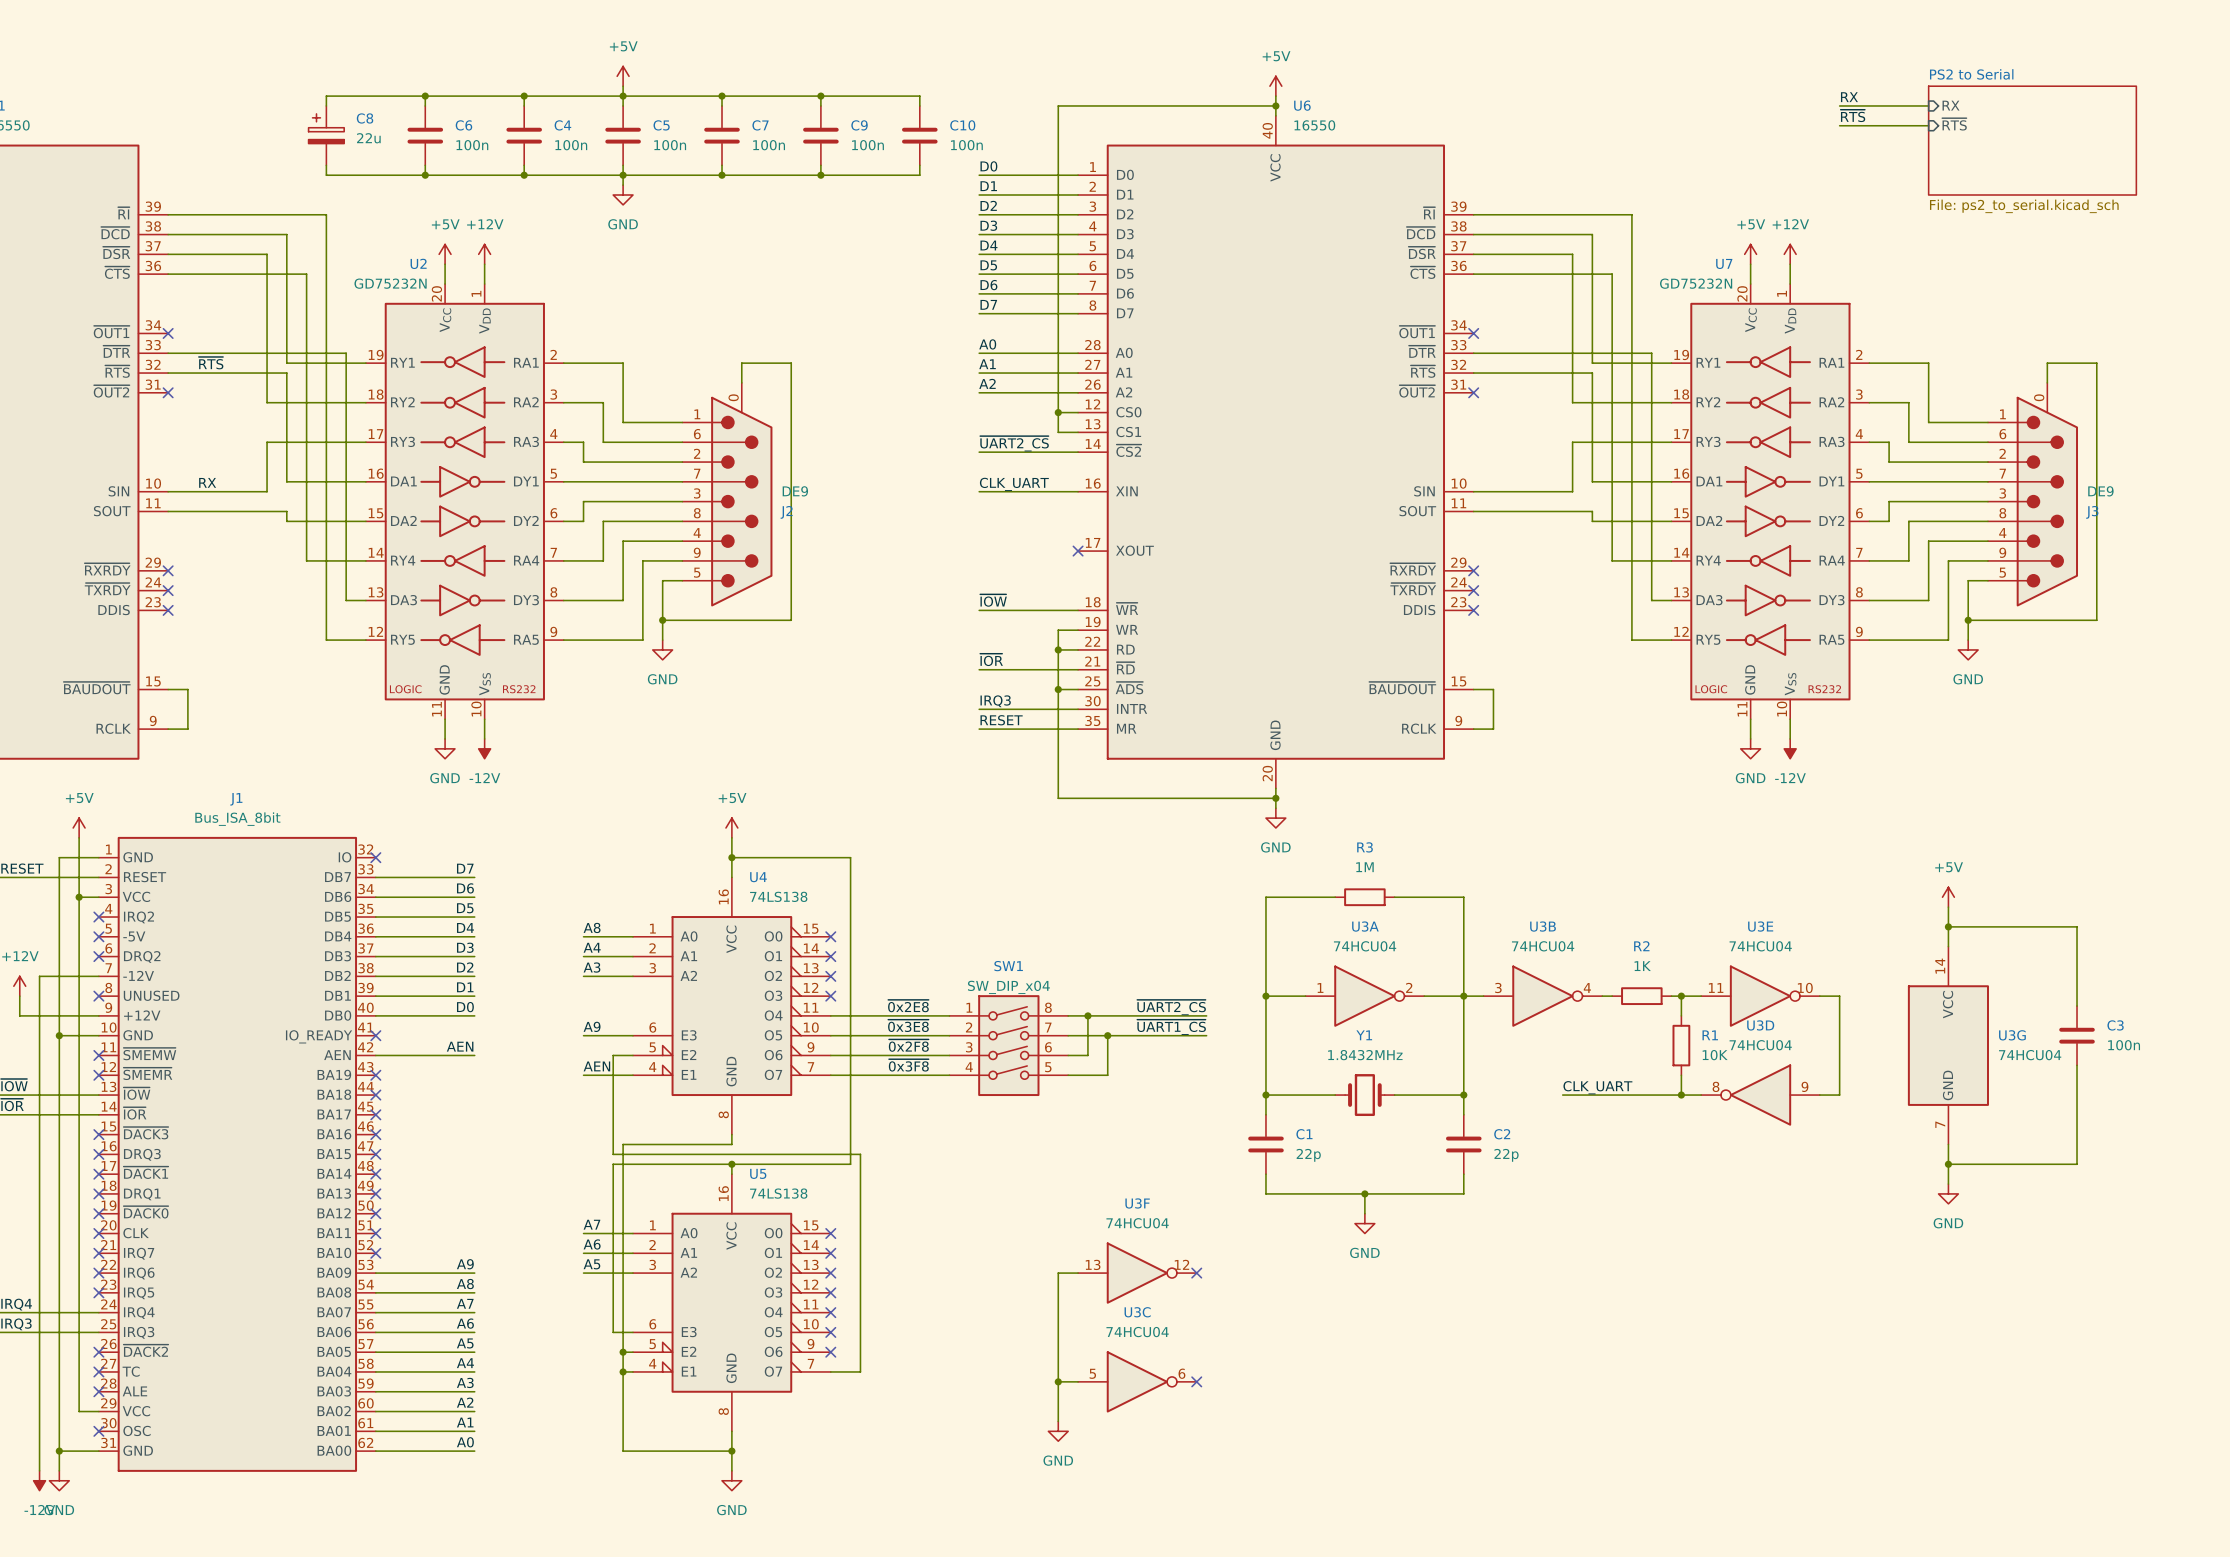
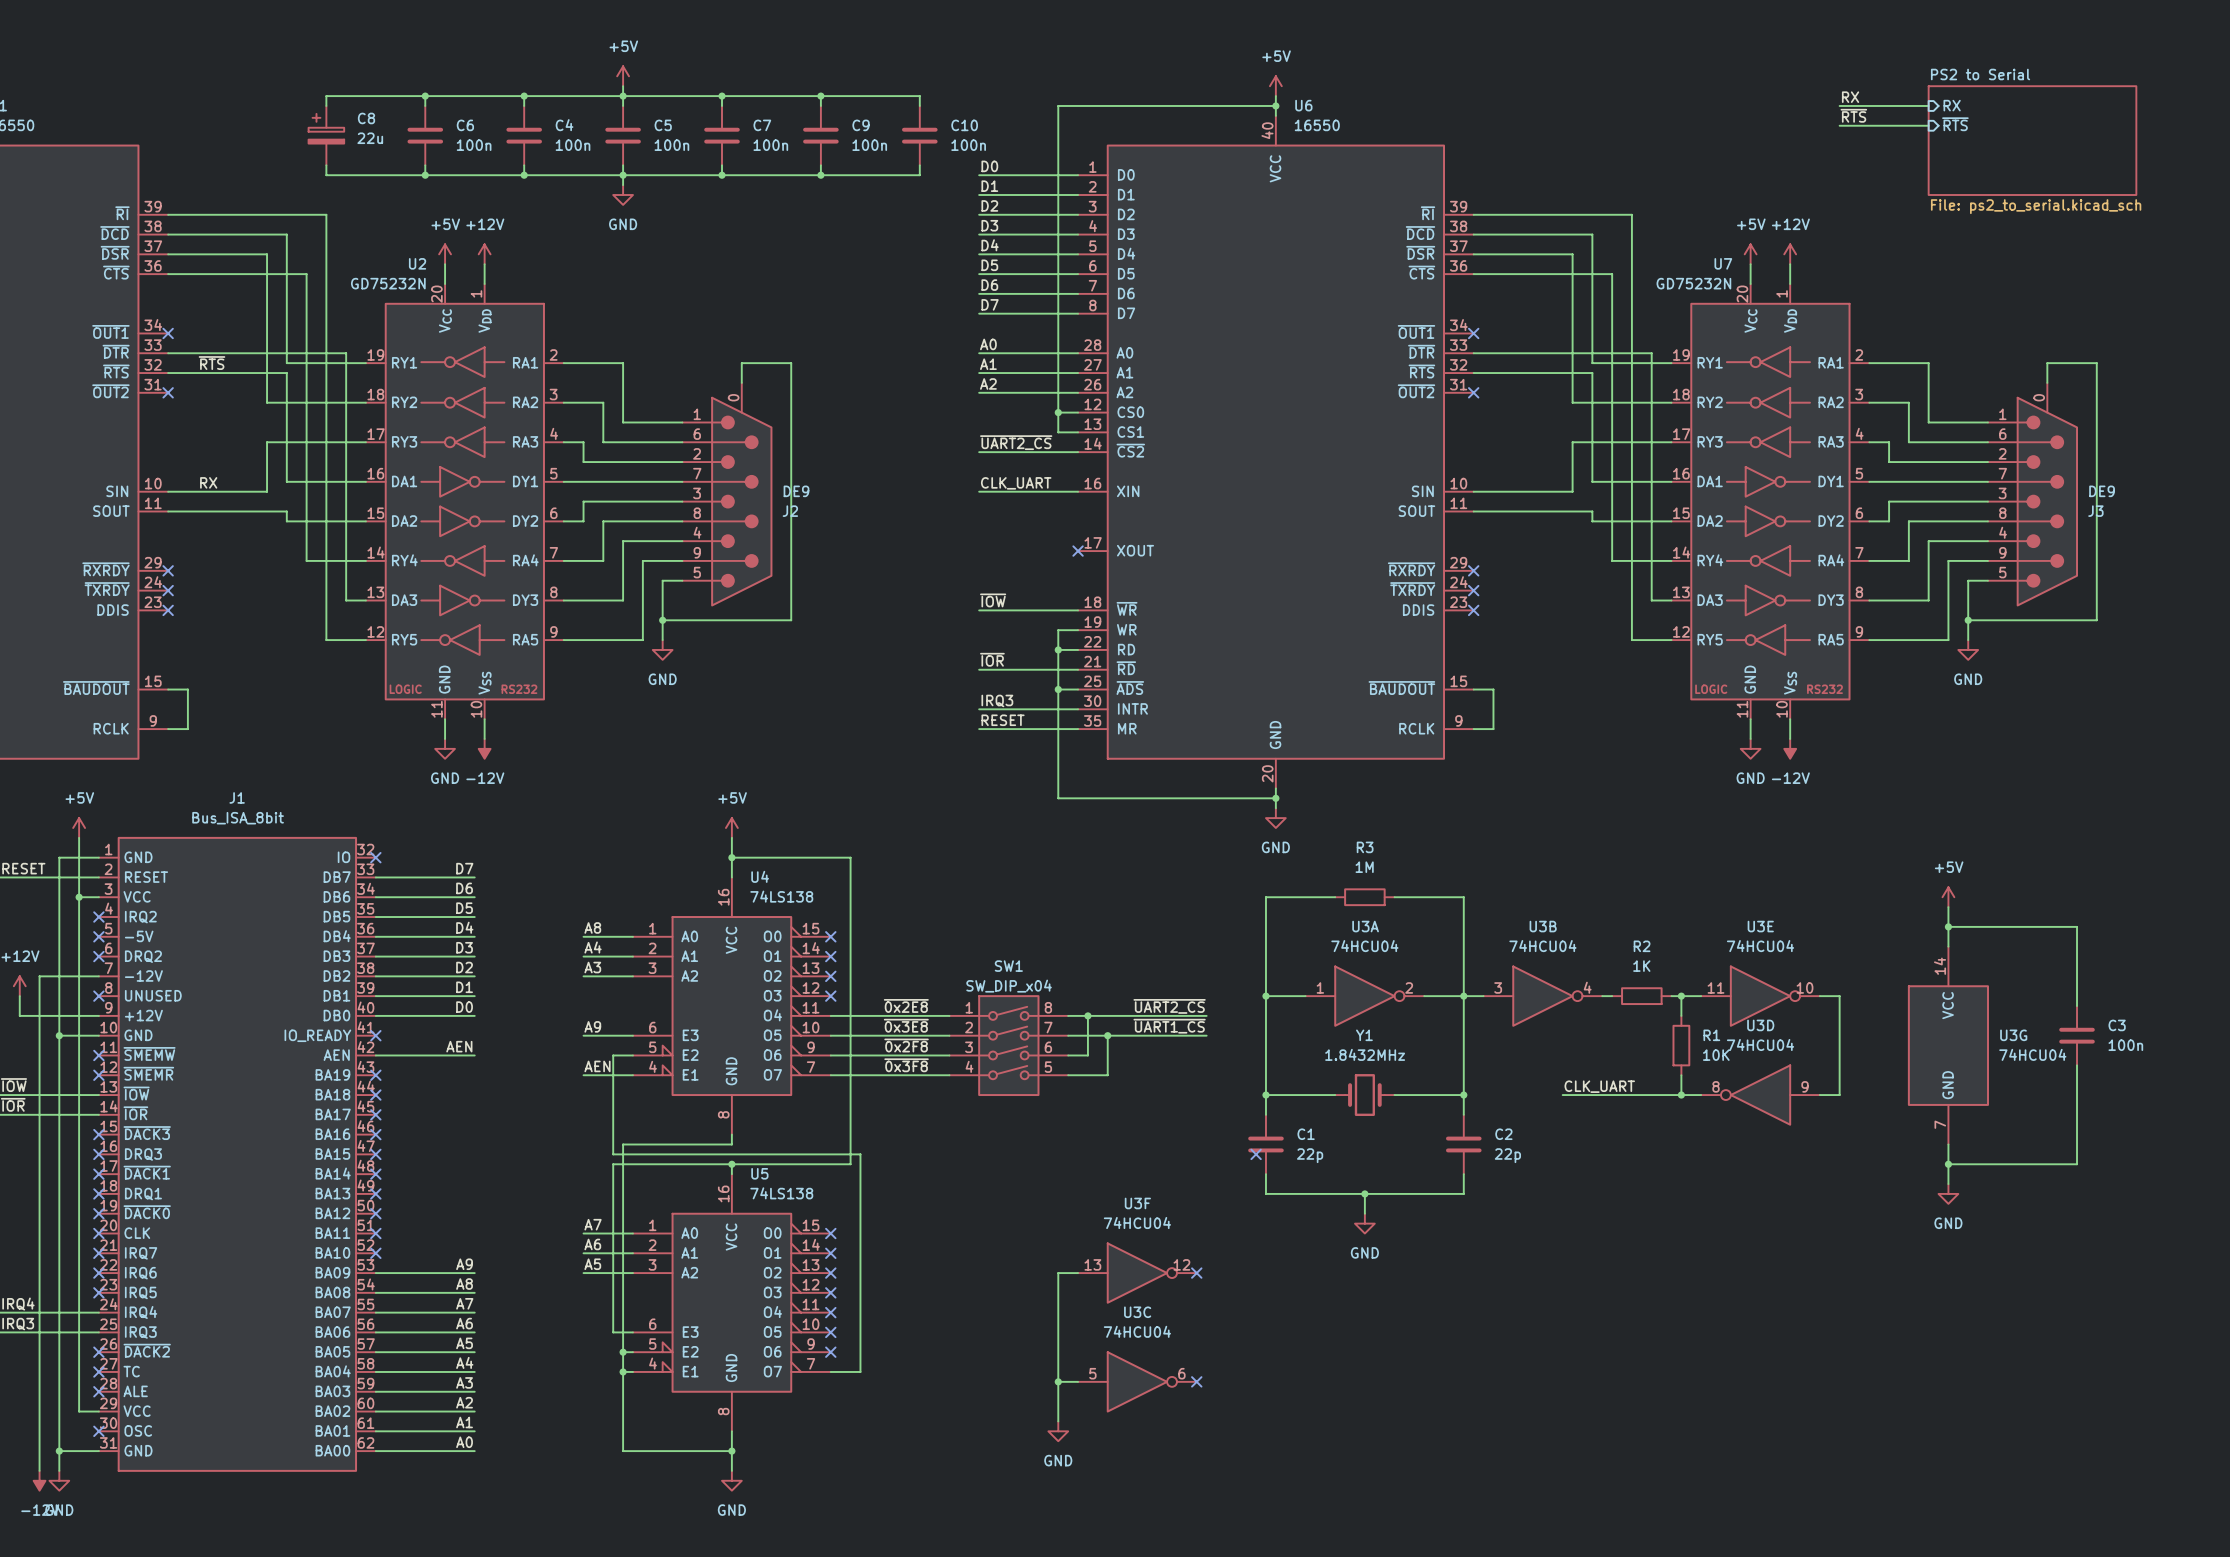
no-connect mark: none -> (1256, 1154)

